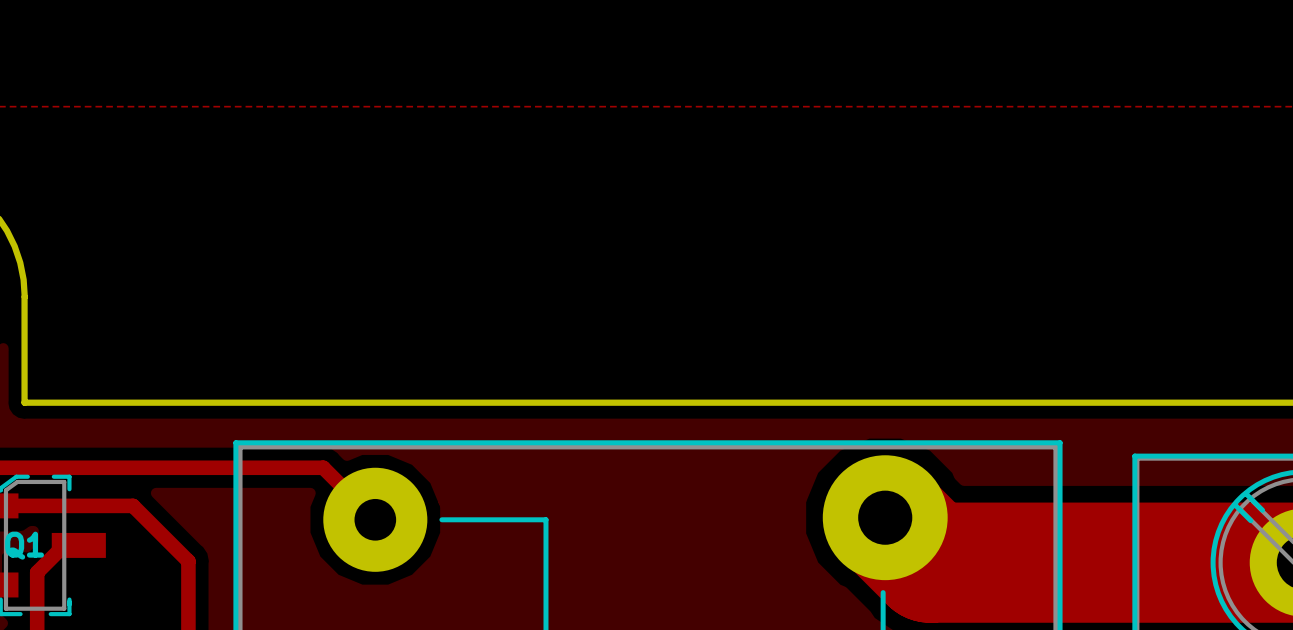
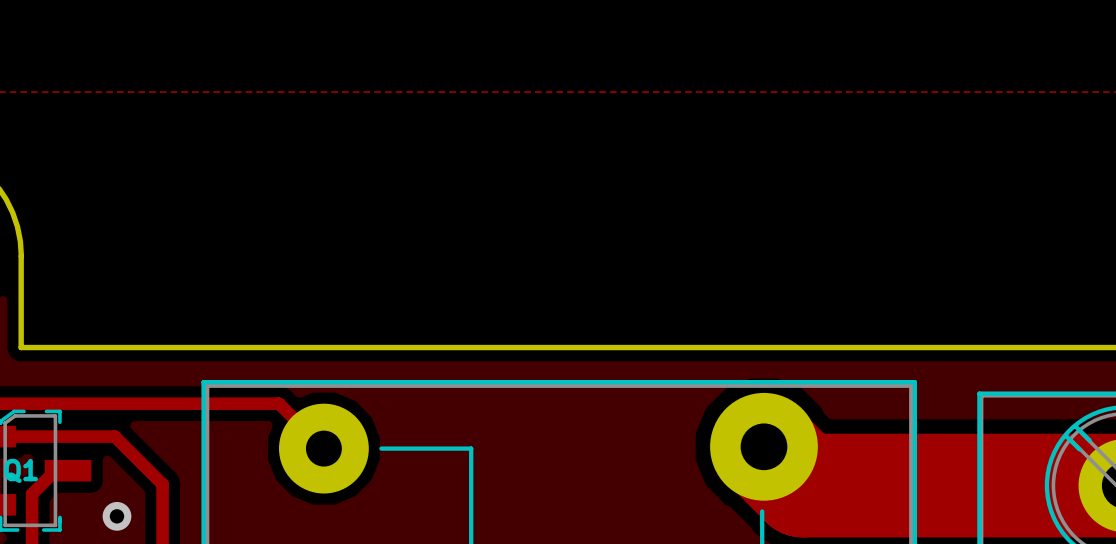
via: none -> (116, 516)

